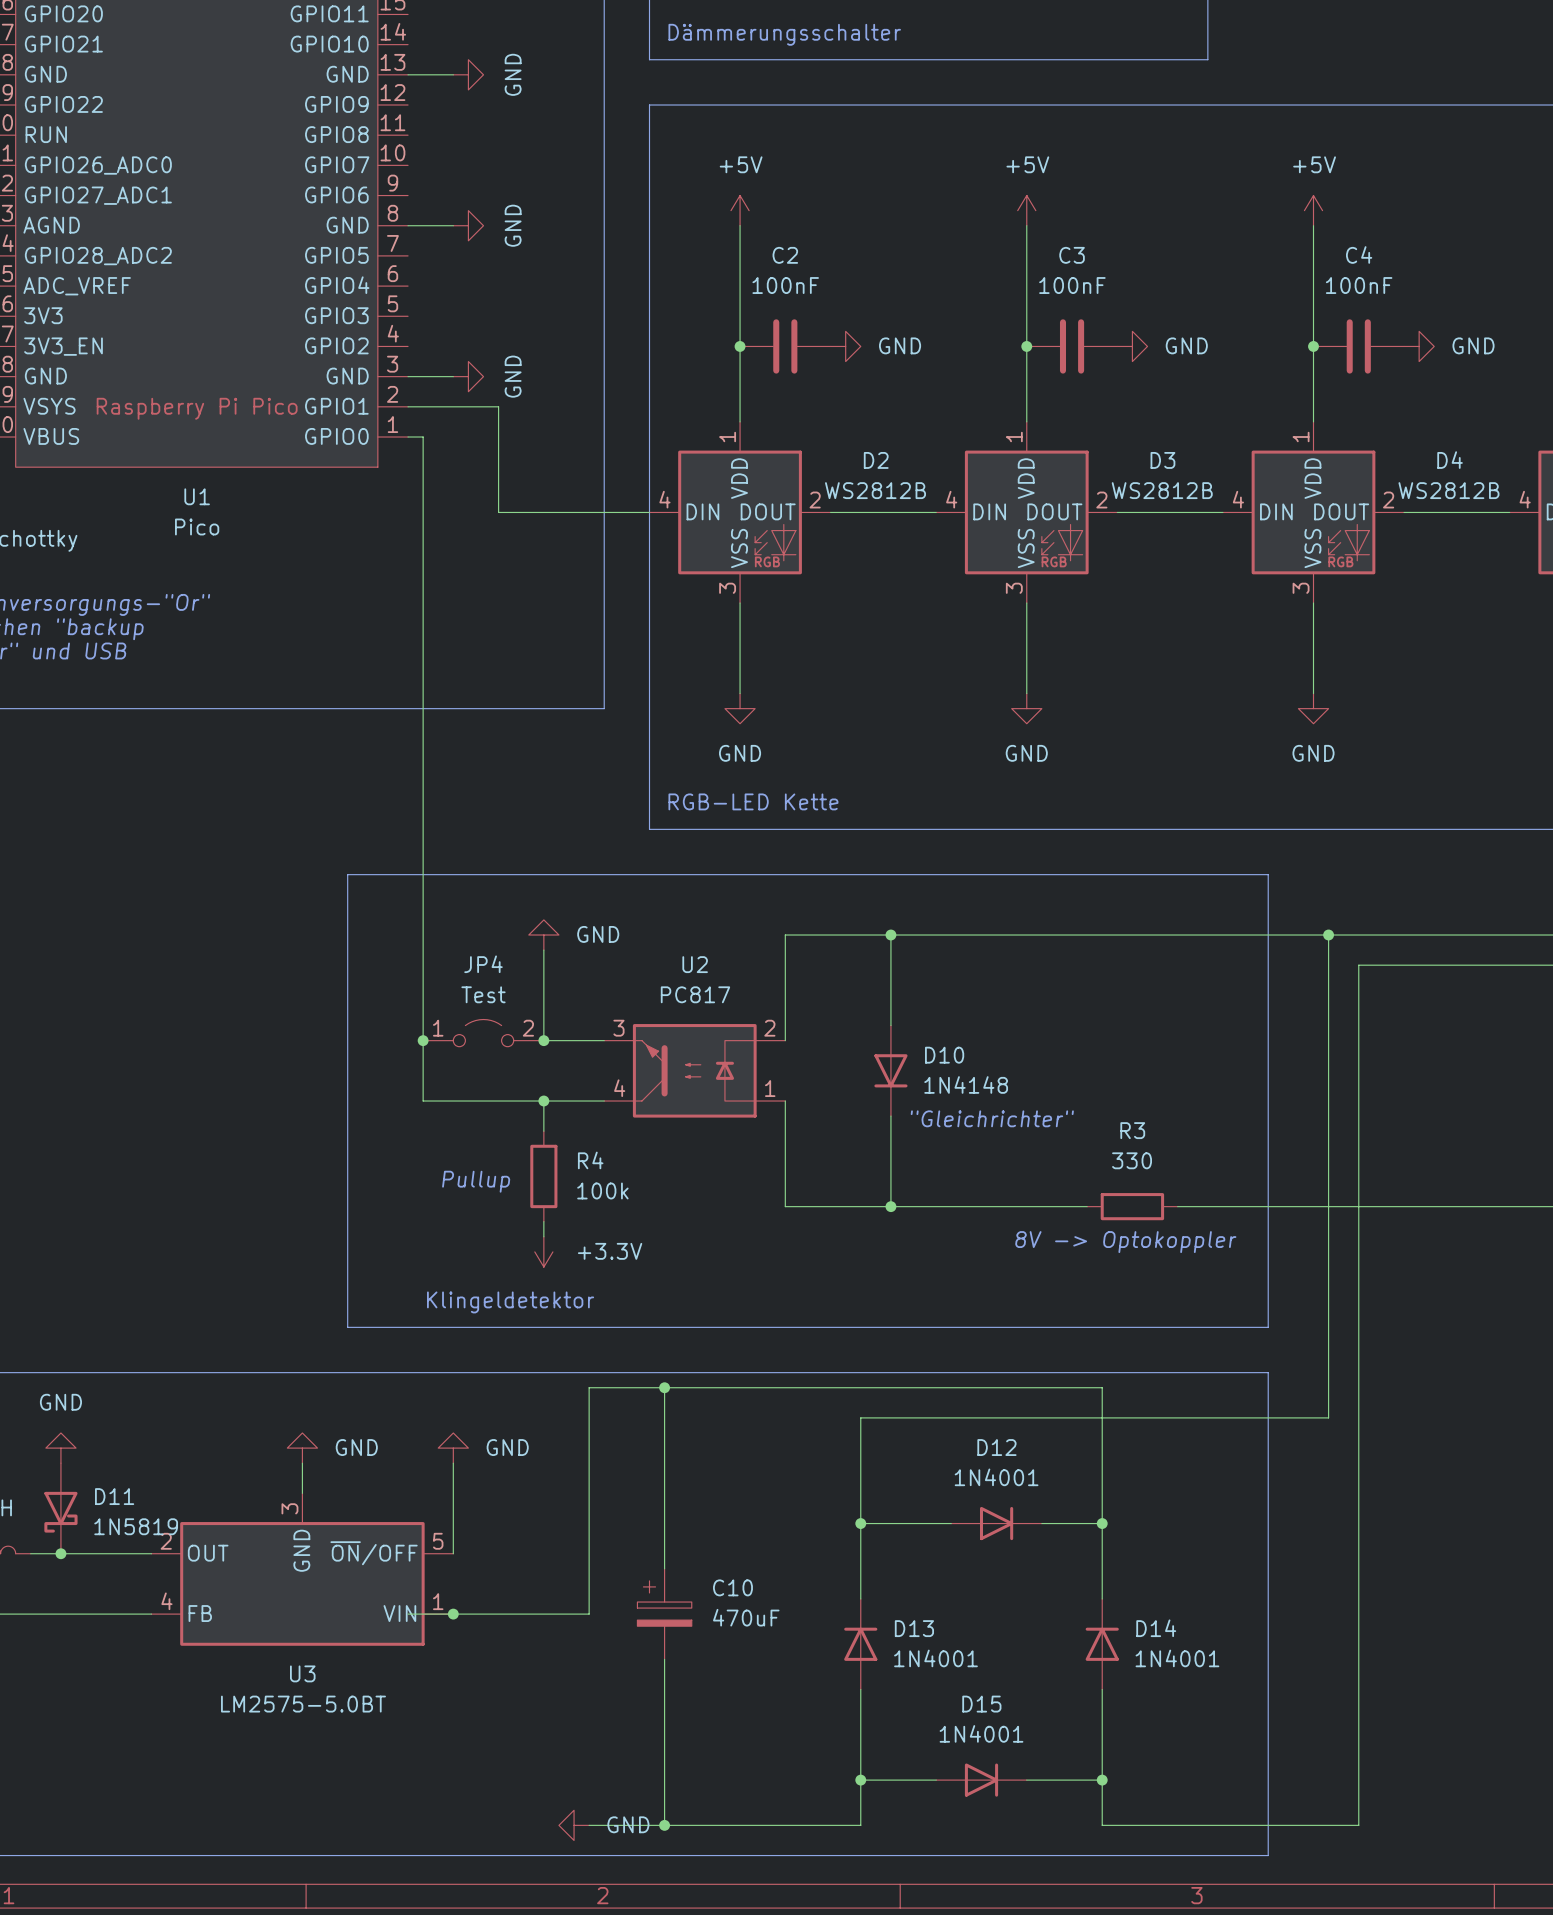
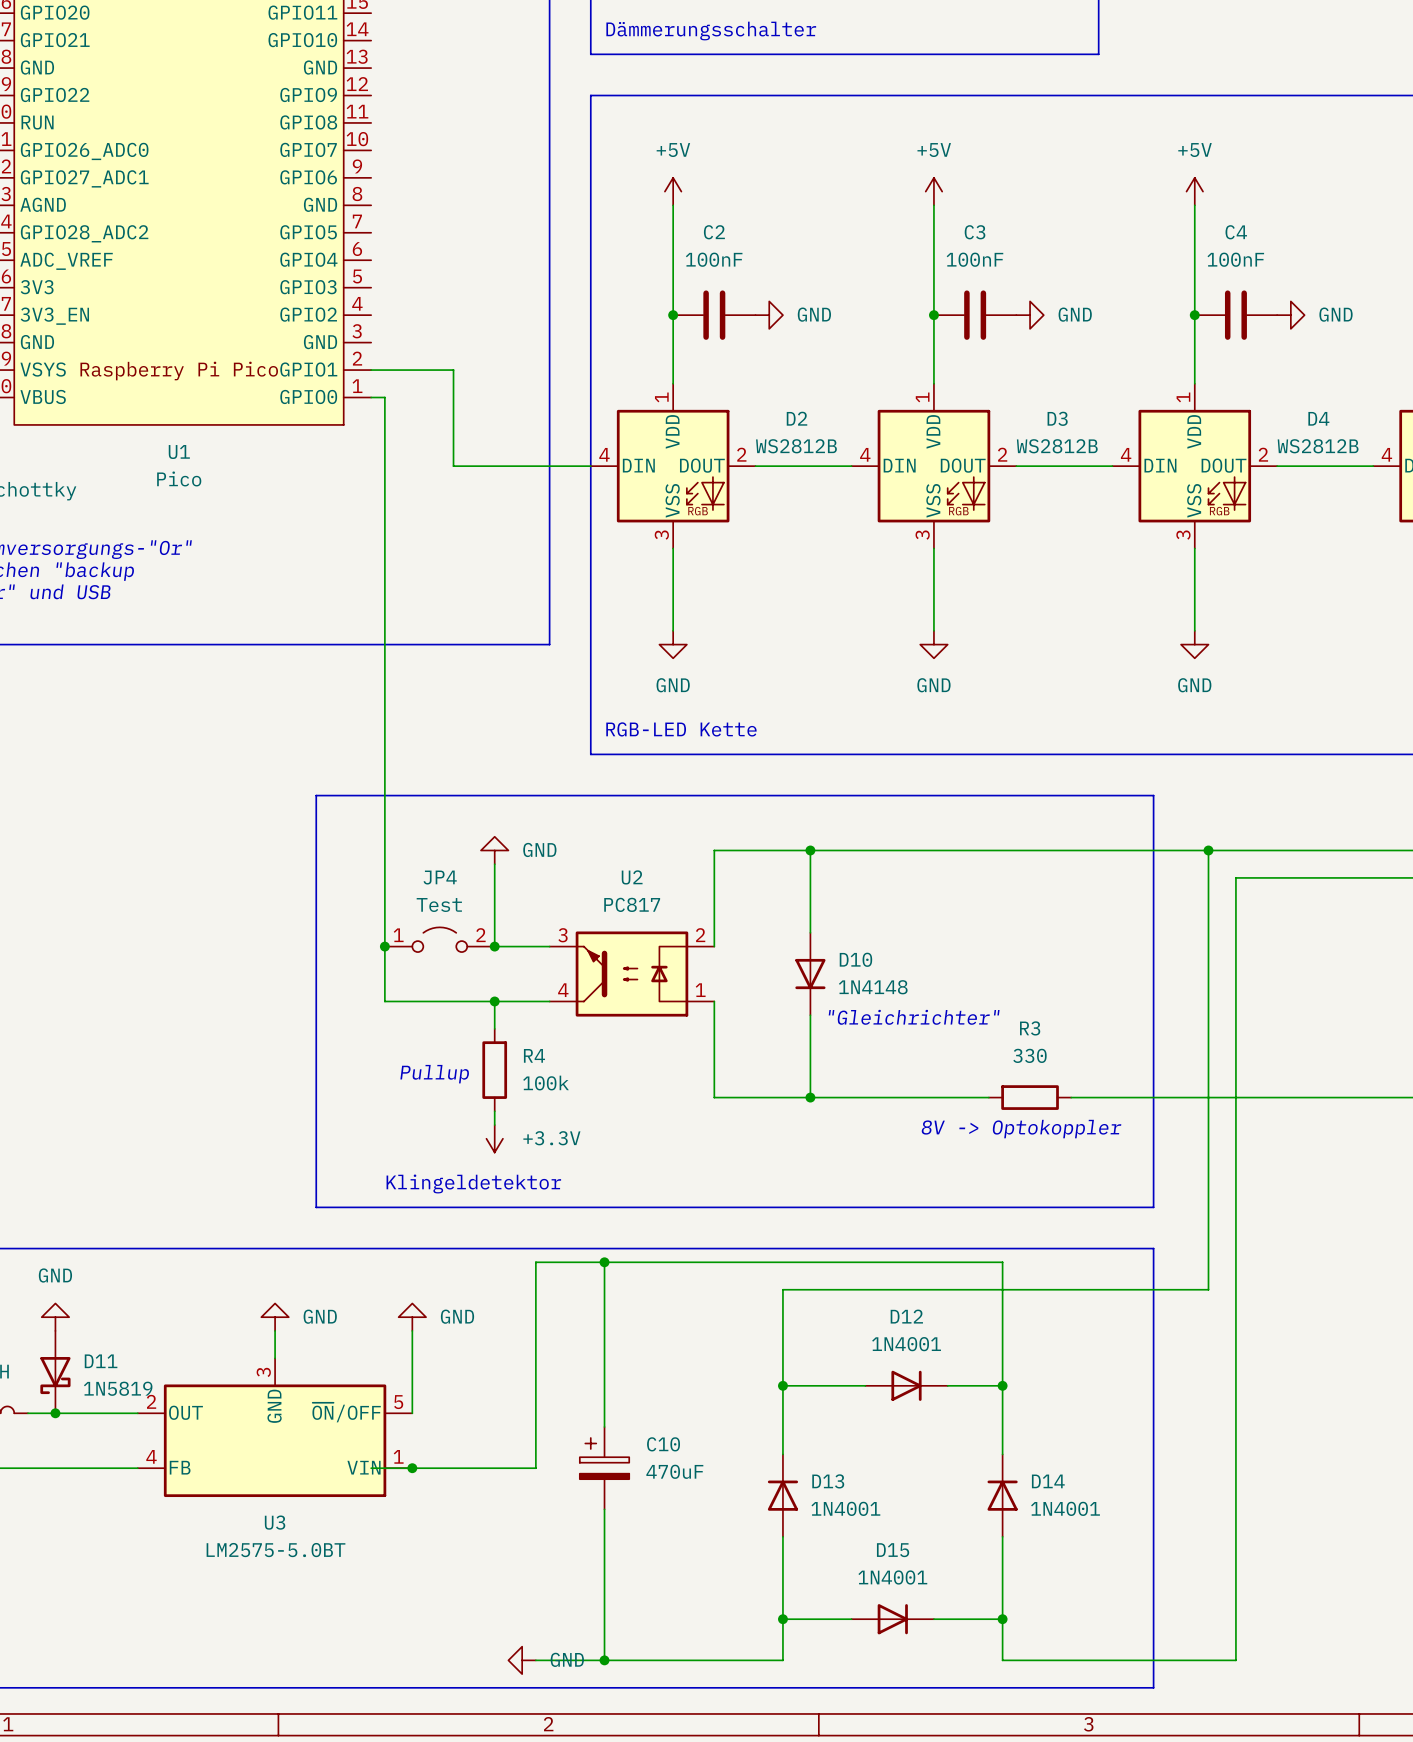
wire: (408, 74) (453, 74) -> none
power symbol: GND (468, 74) -> none
wire: (408, 225) (453, 225) -> none
power symbol: GND (468, 225) -> none
wire: (408, 376) (453, 376) -> none
power symbol: GND (468, 376) -> none

